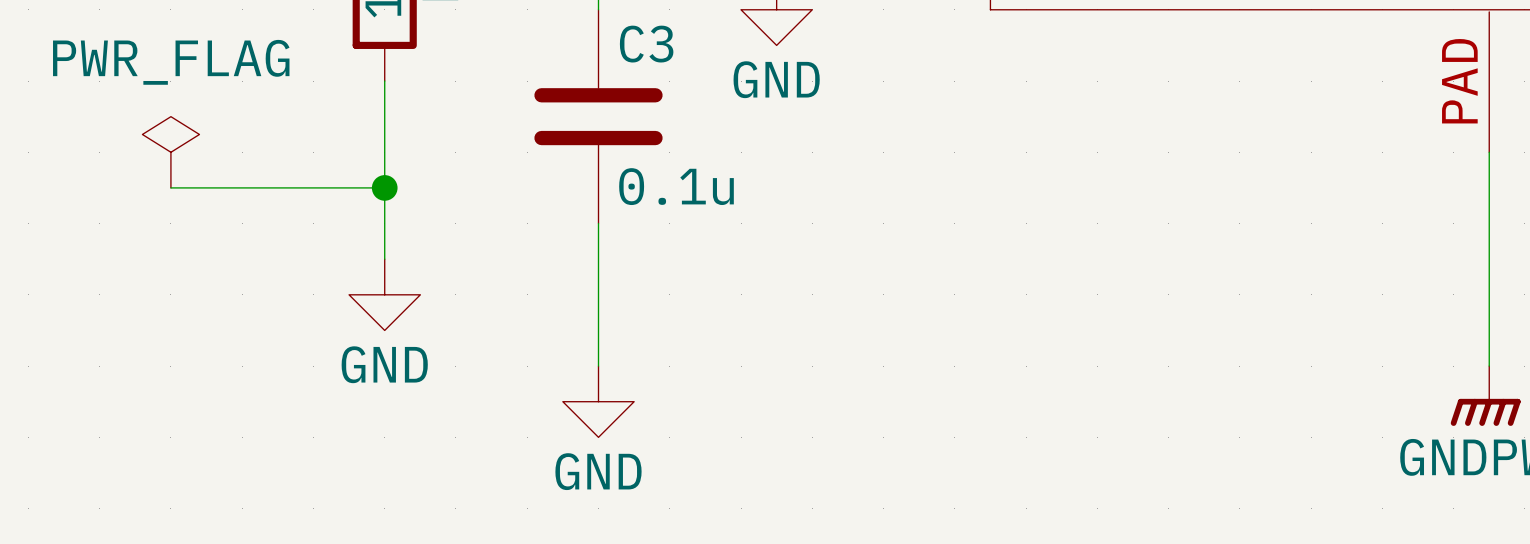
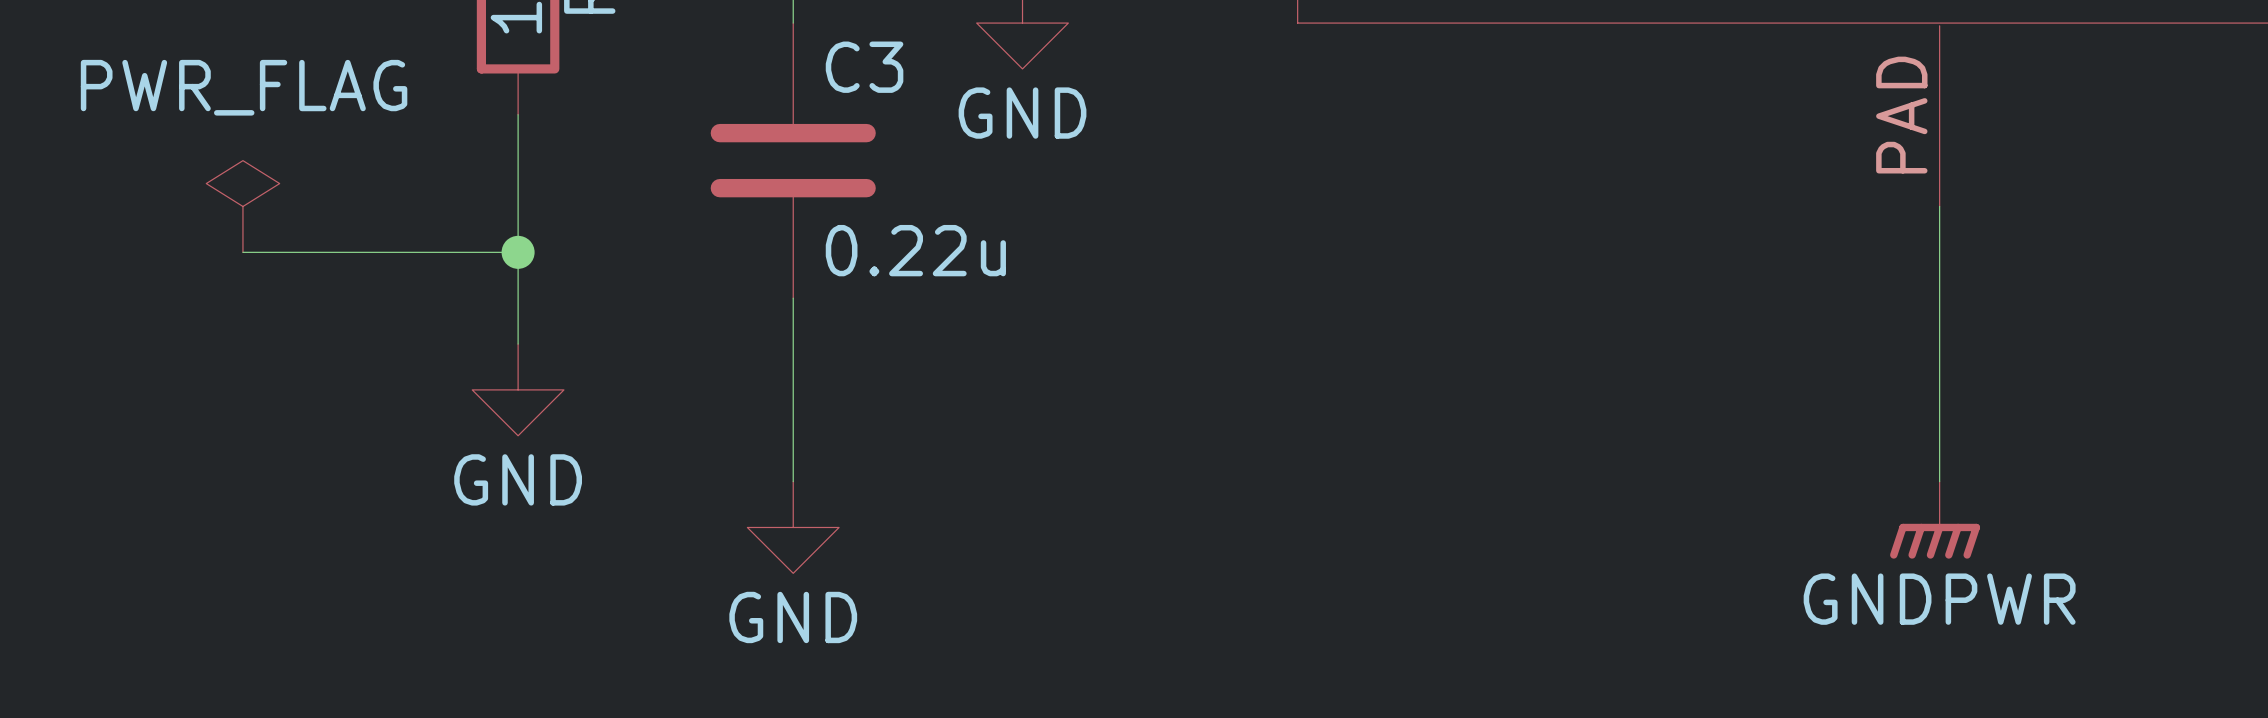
C3 value: 0.1u (676, 186) -> 0.22u (915, 250)

